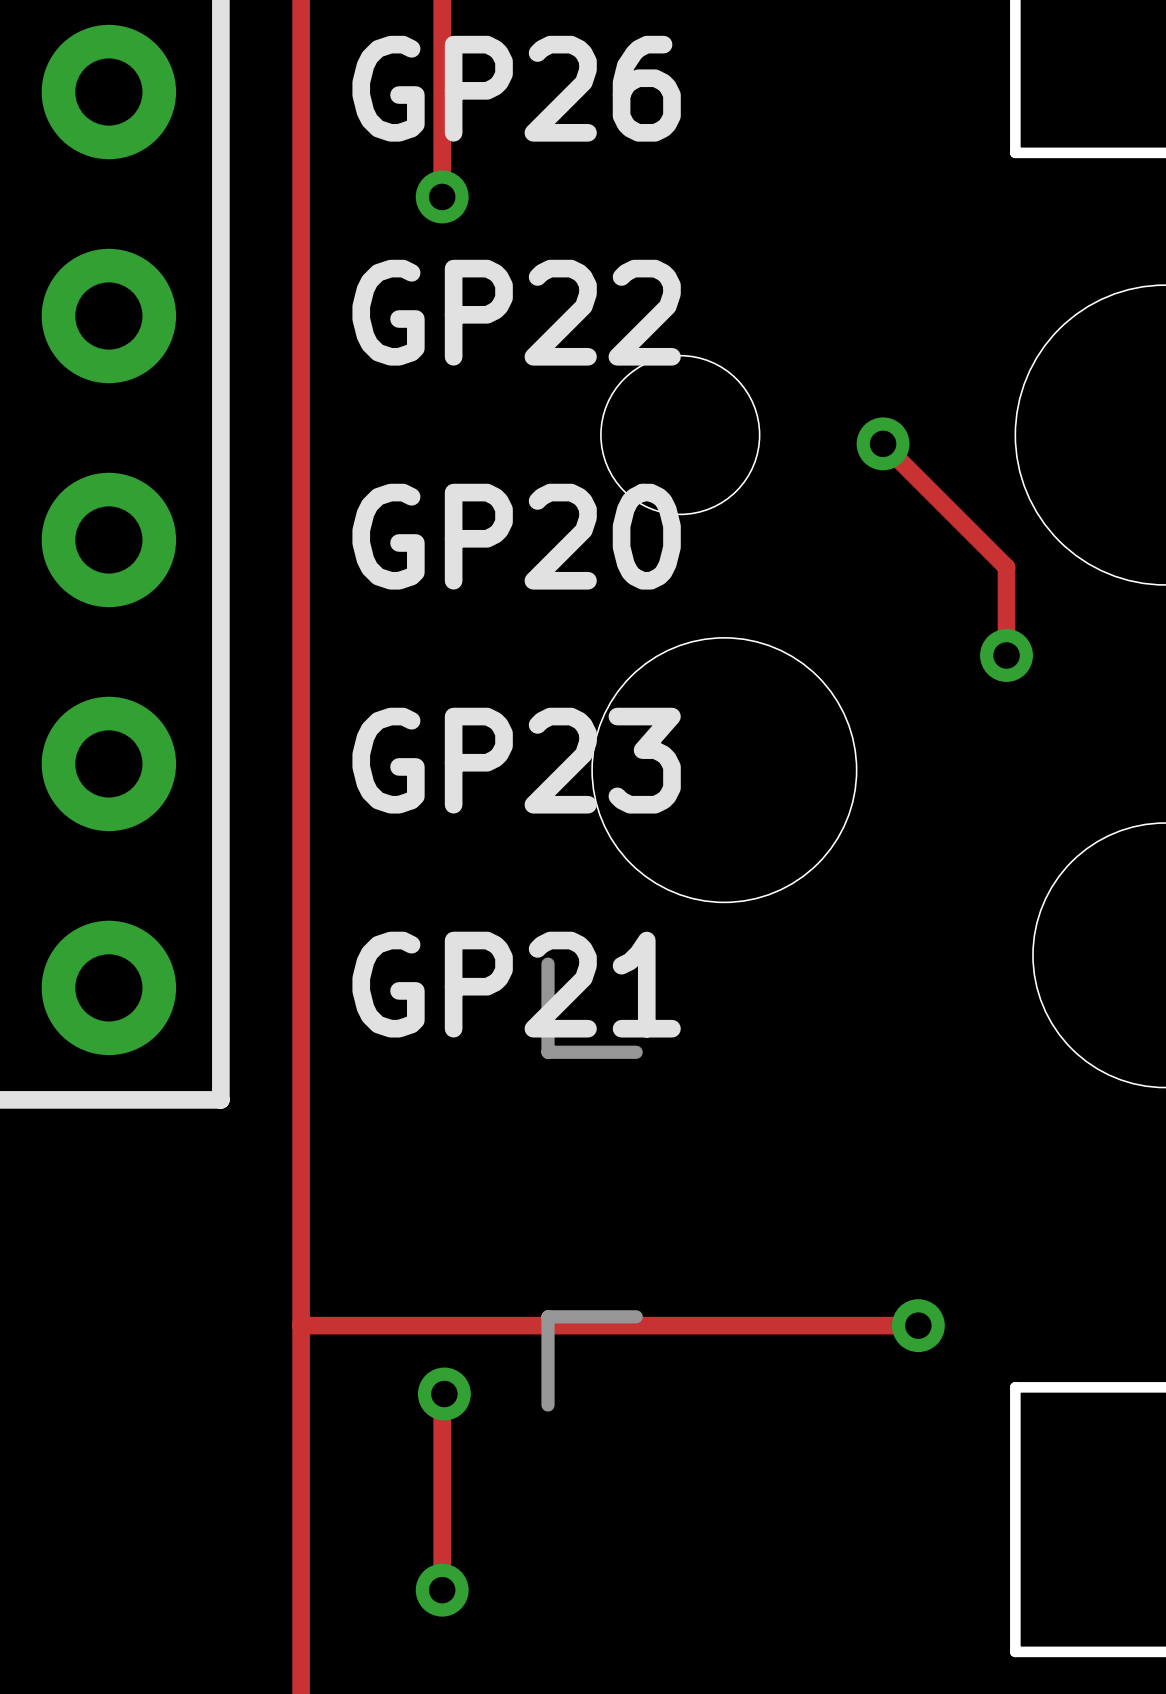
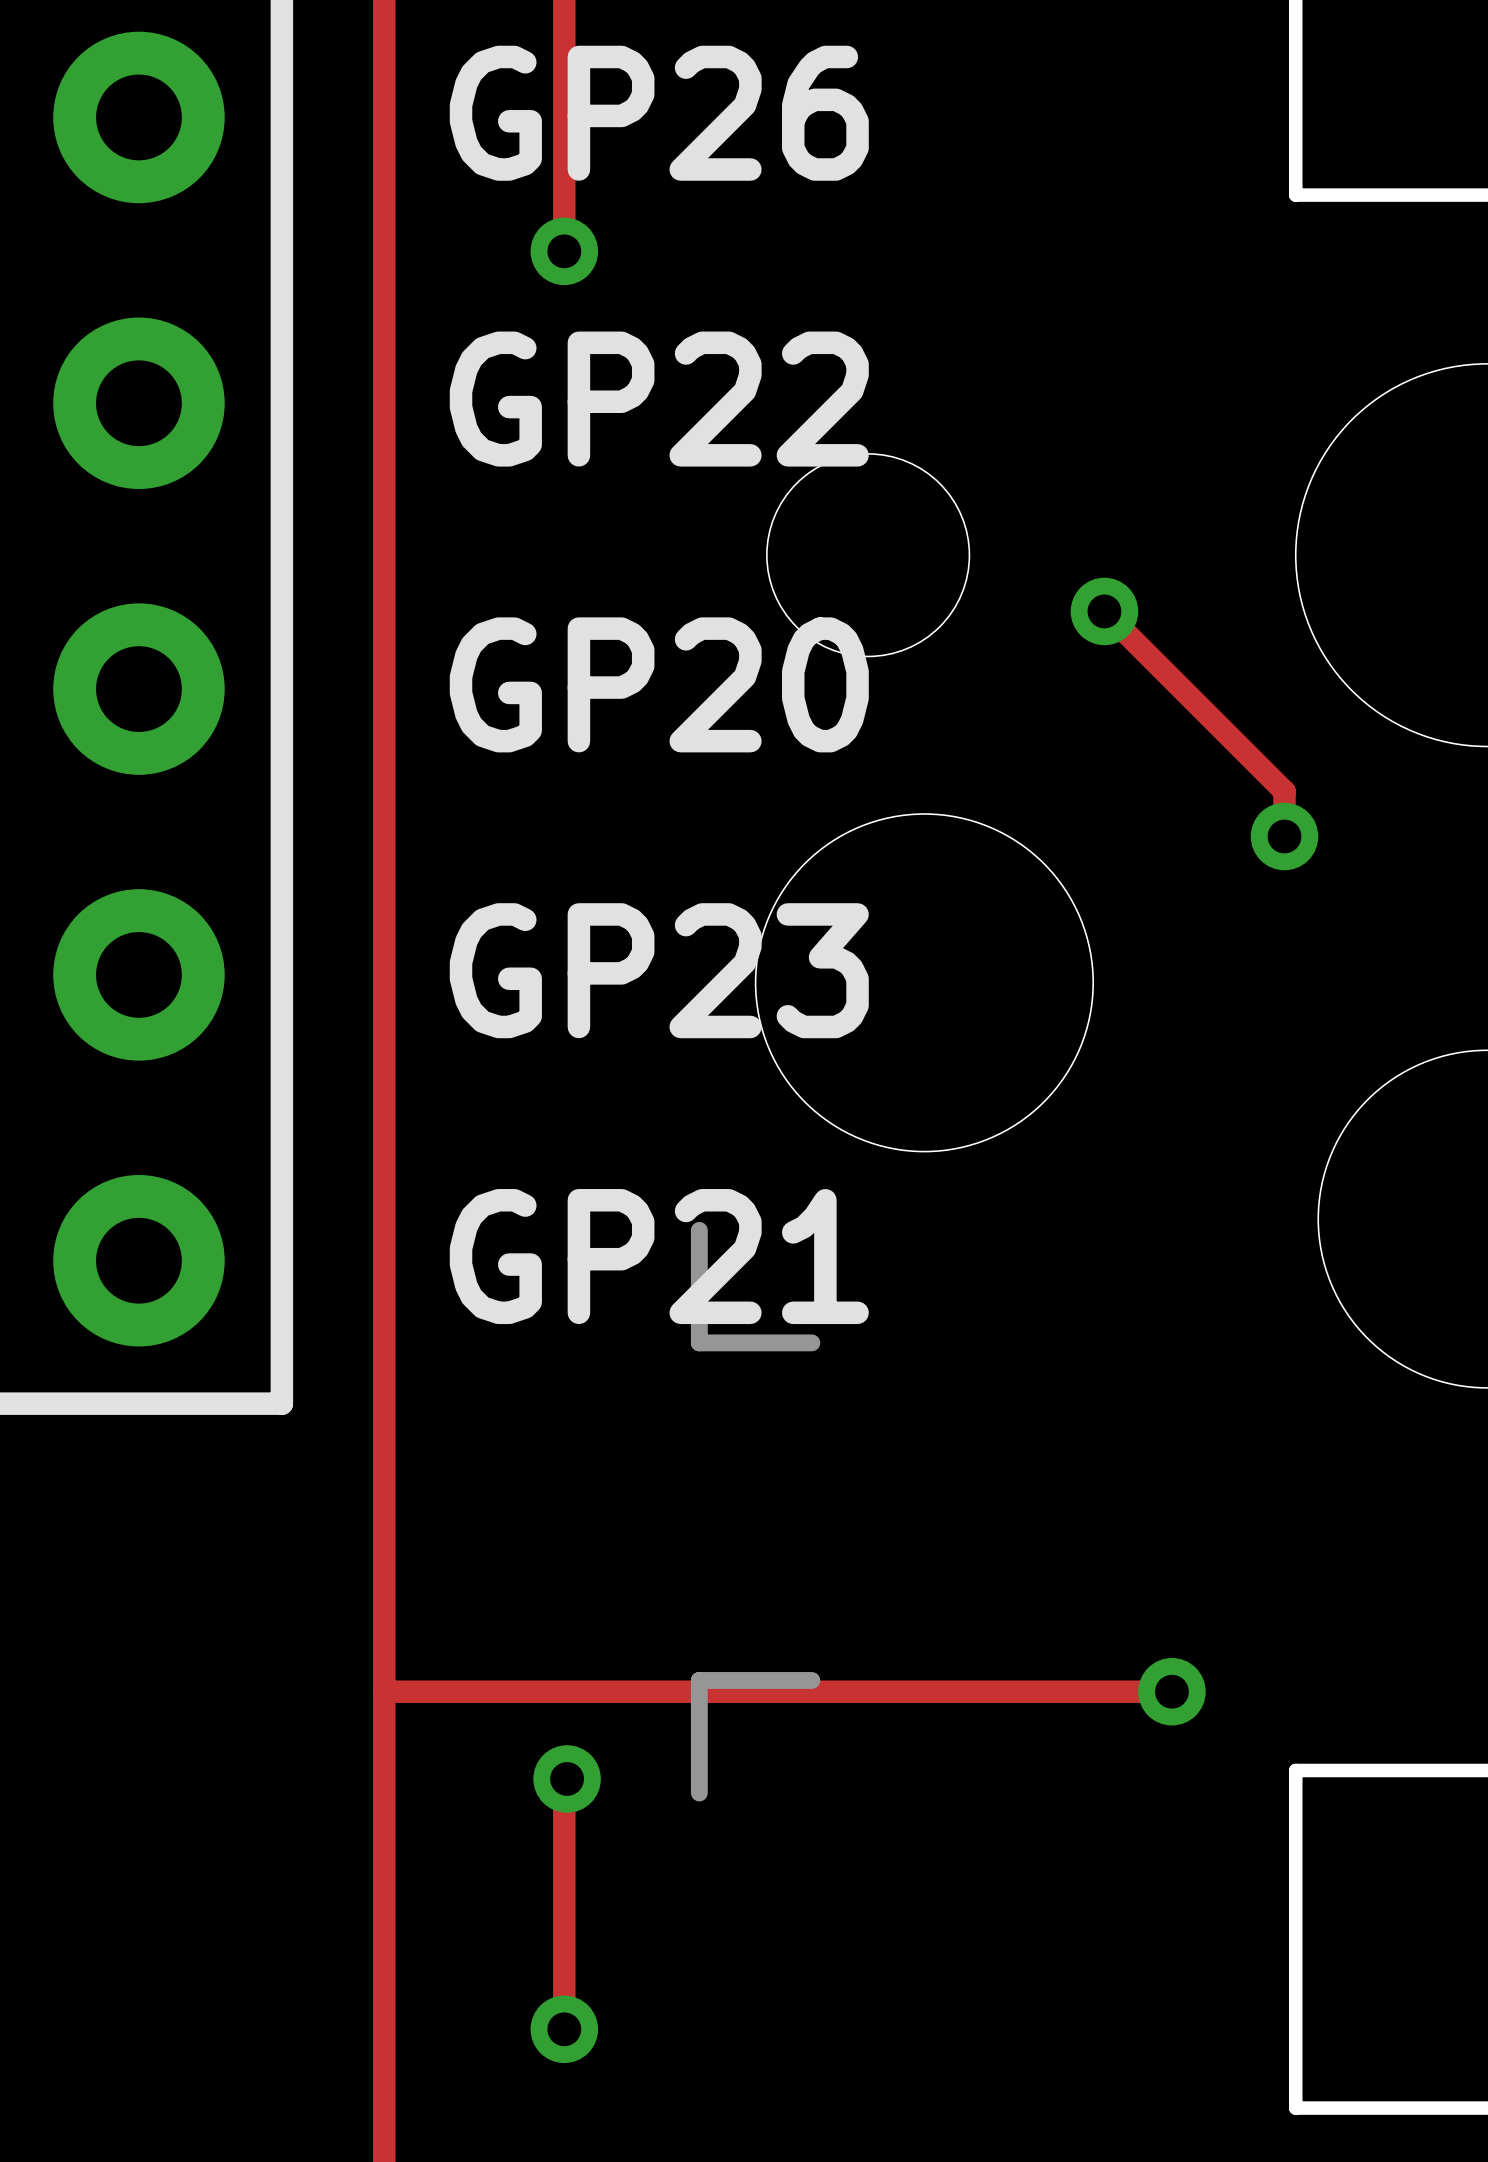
track: (883, 443) (1006, 567) (1006, 620) -> (1104, 611) (1284, 791)
via position: (883, 443) -> (1104, 611)

